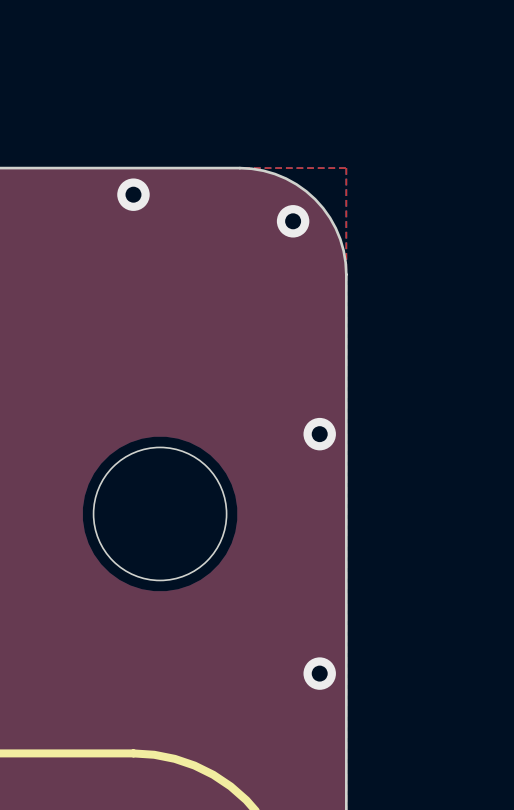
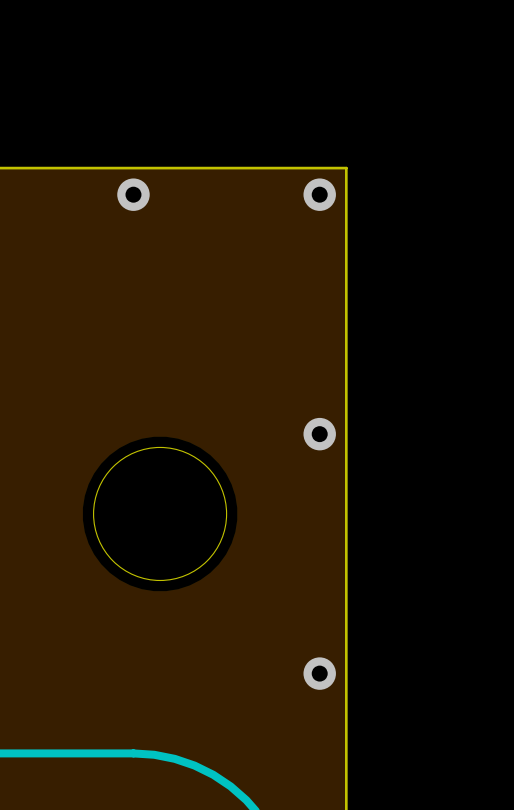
board edge: (239, 168) (263, 170) (286, 178) (315, 199) (335, 228) (343, 250) (346, 274) -> (239, 168) (346, 168) (346, 274)
via position: (293, 221) -> (319, 194)

